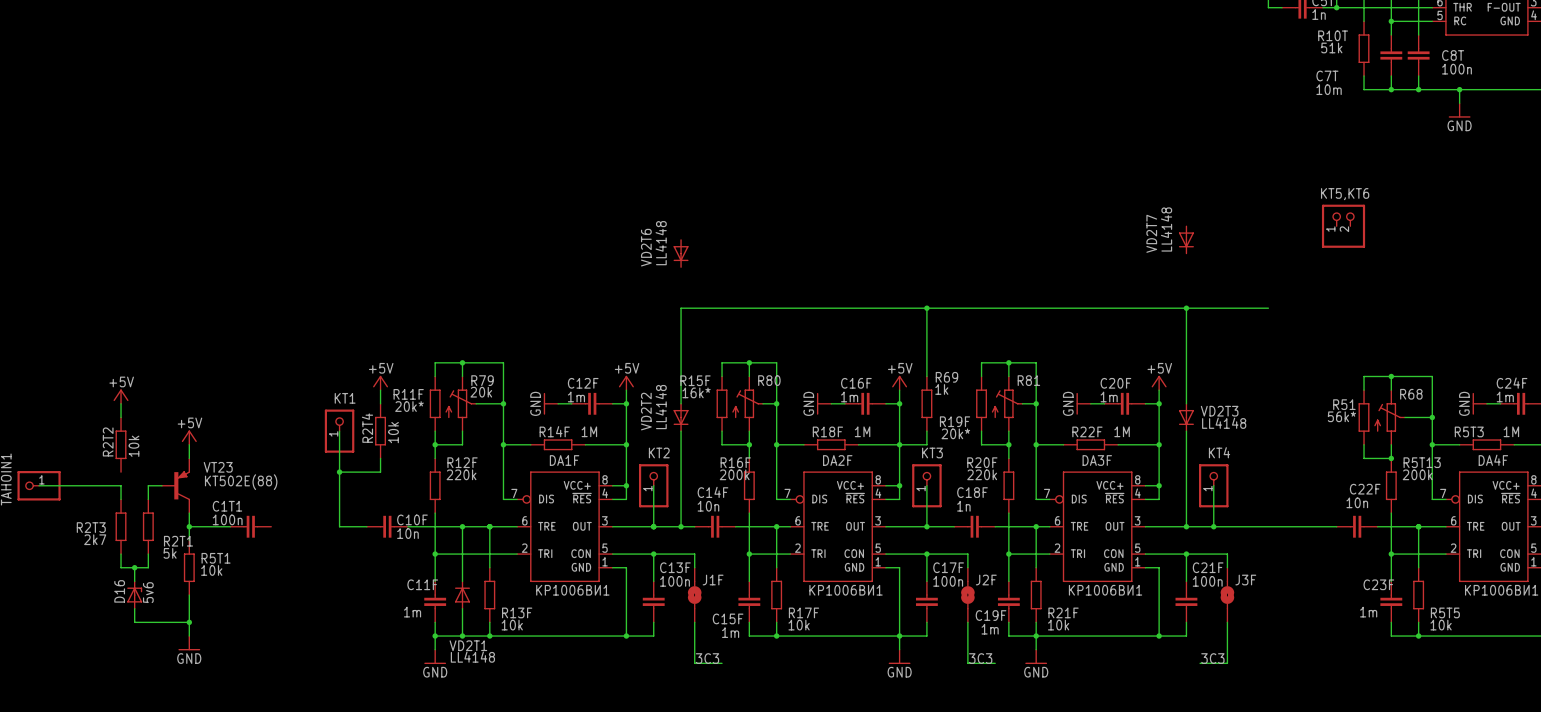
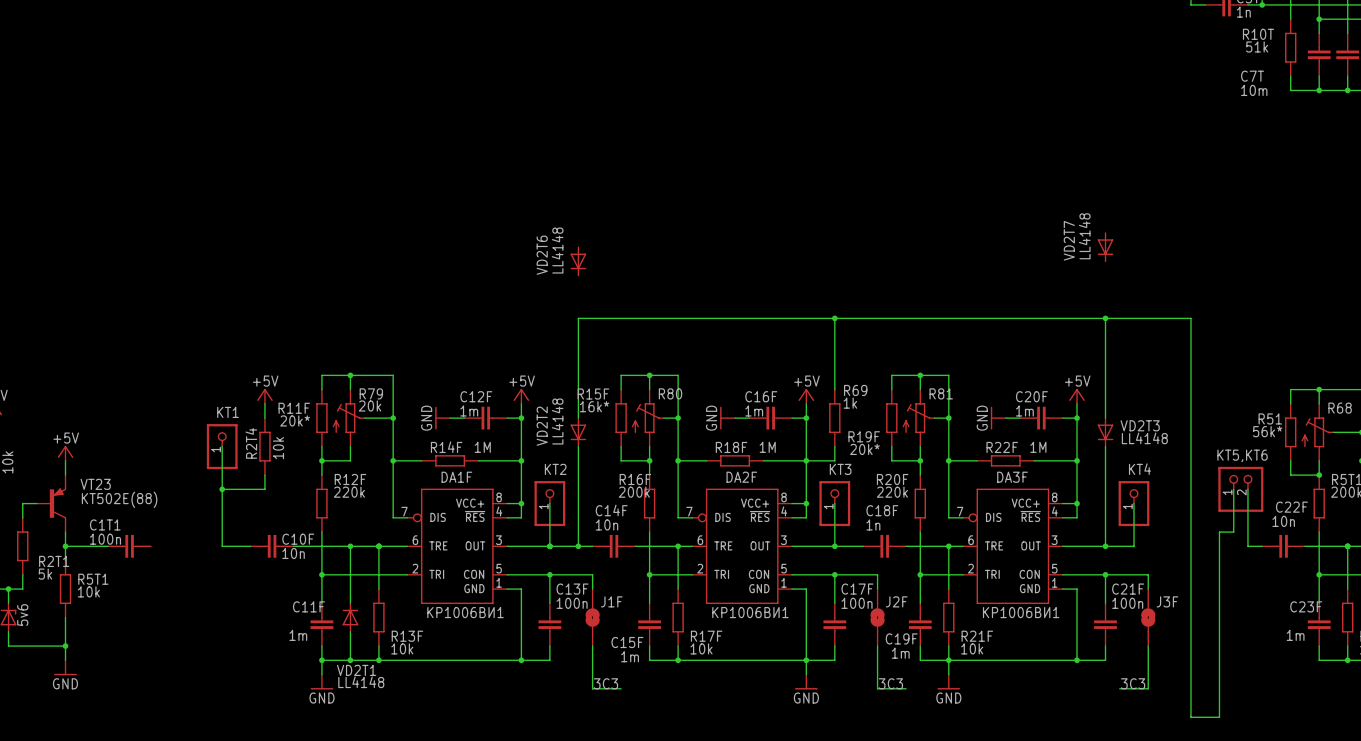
KT5,KT6 position: (1343, 226) -> (1240, 489)
wire: none -> (1190, 318) (1190, 717) (1219, 717) (1219, 532) (1233, 532) (1233, 489)
wire: (1213, 526) (1323, 526) -> (1247, 489) (1247, 546)
junction: (1213, 526) -> none

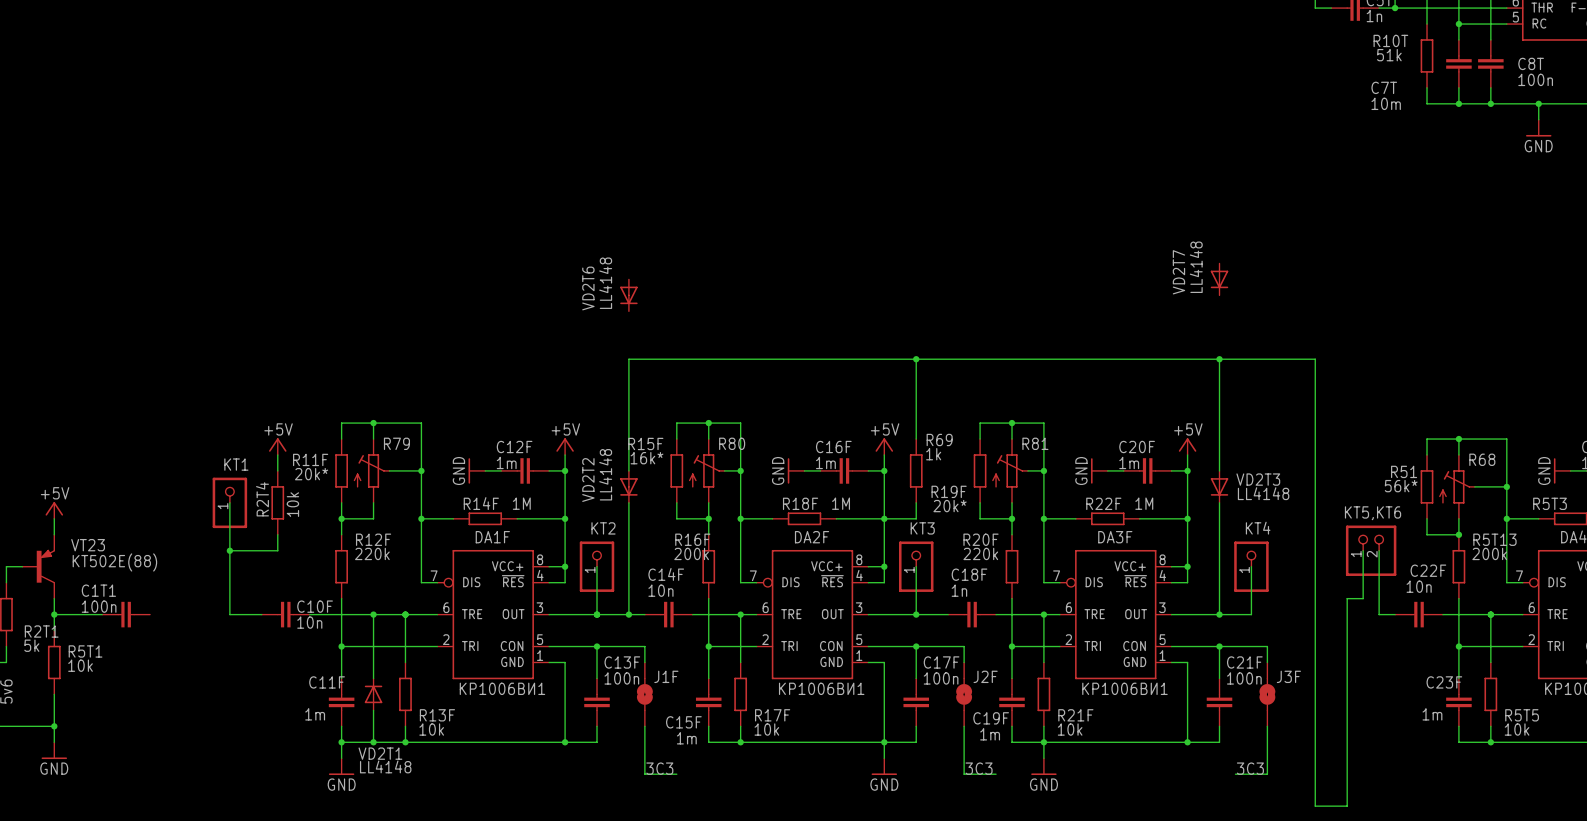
R79 value: 20k (370, 405) -> none

